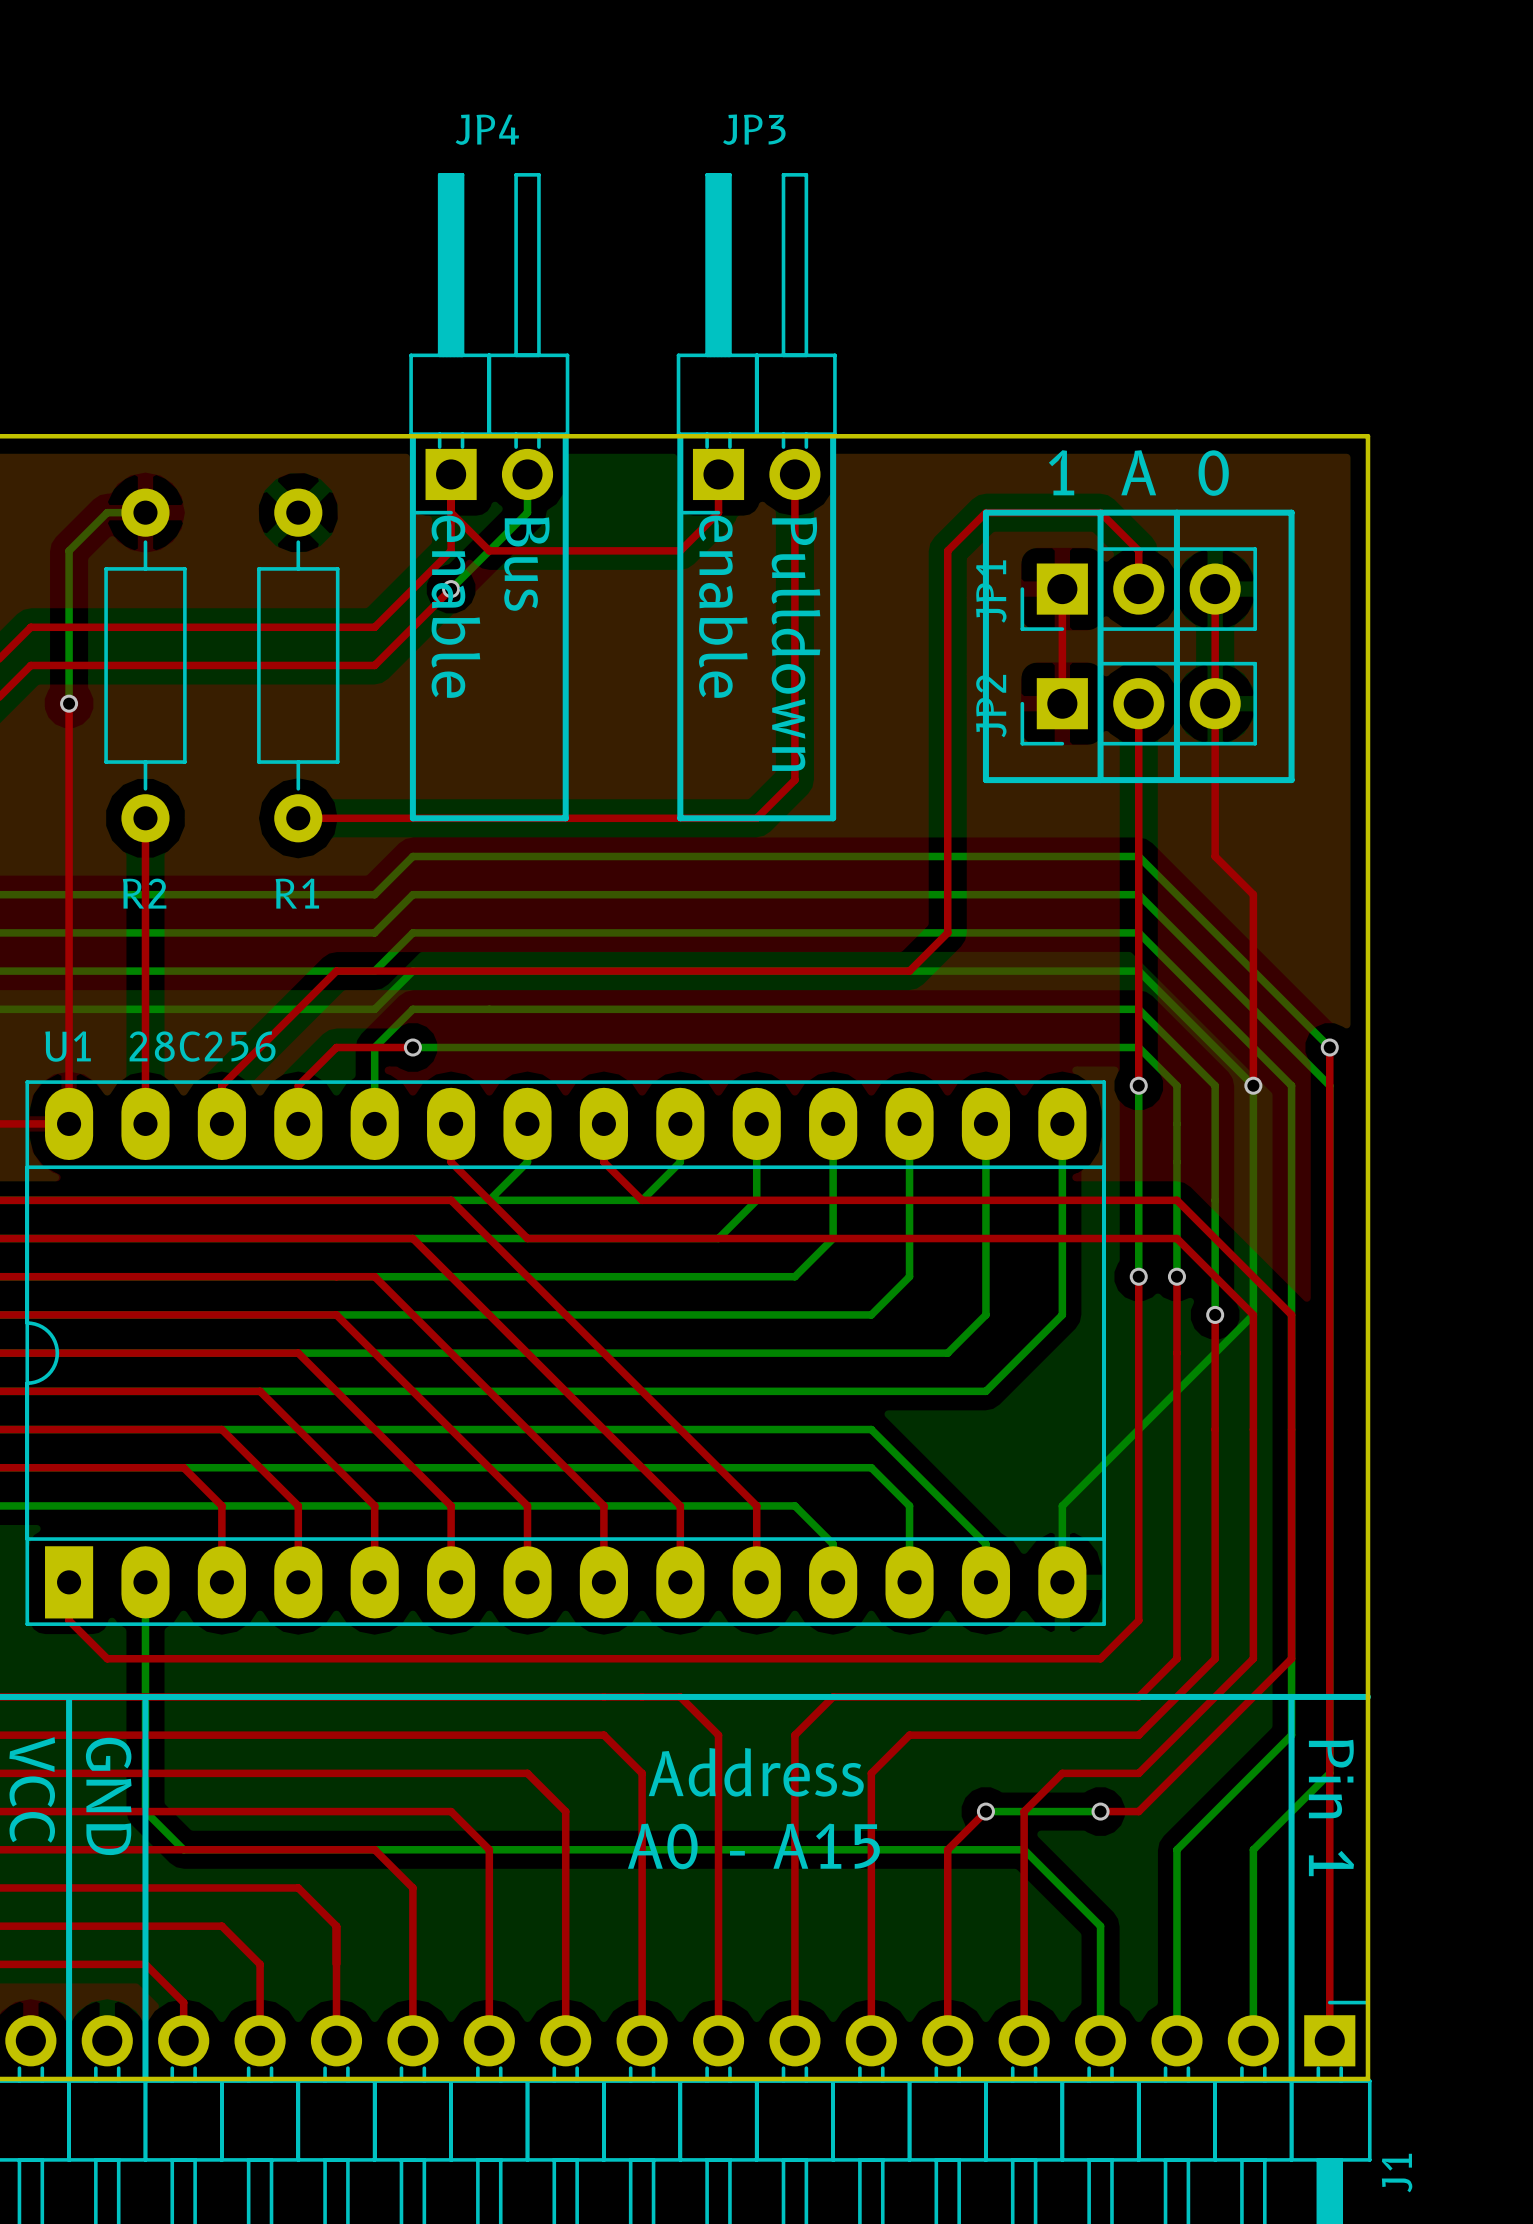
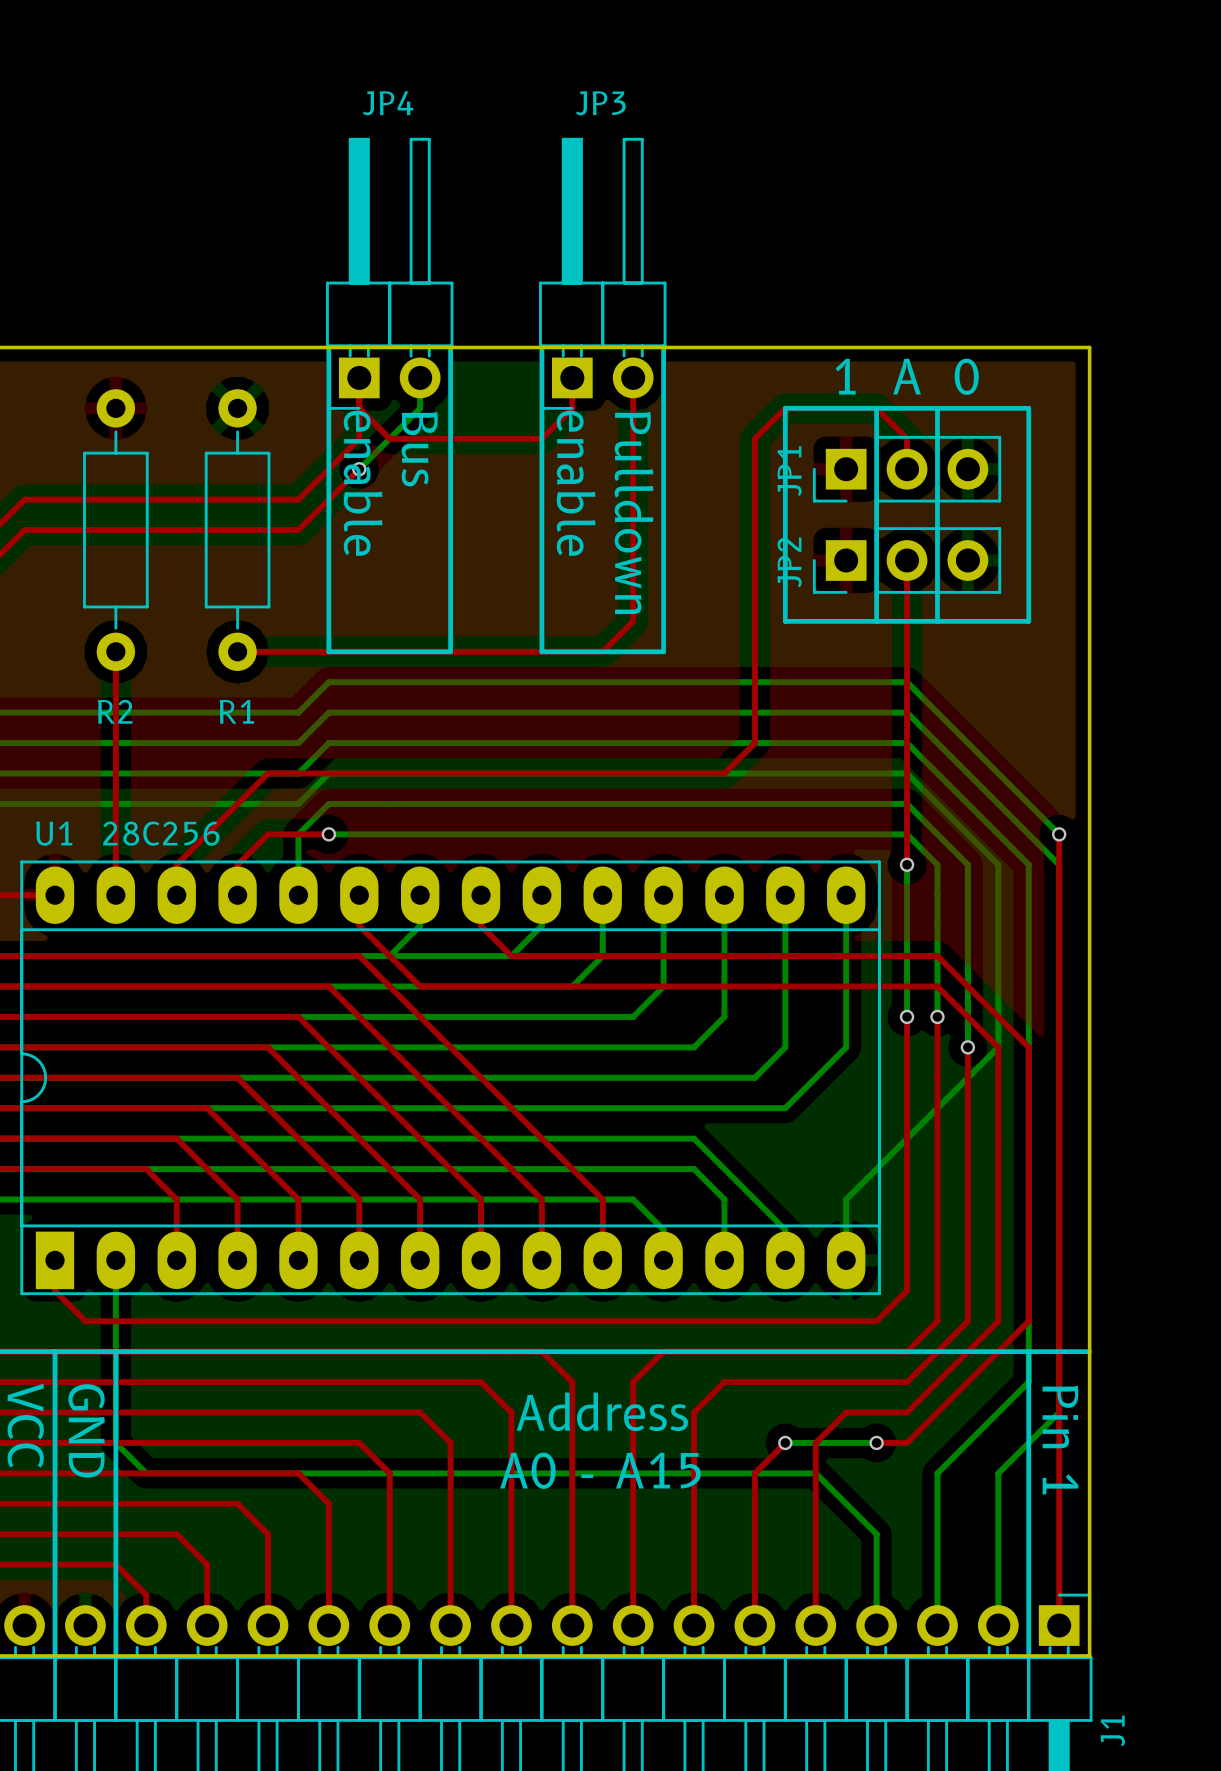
bottom track: (145, 512) (107, 512) (69, 550) (69, 703) -> none
top track: (1062, 589) (1062, 703) -> none
top track: (1215, 589) (1215, 856) (1253, 894) (1253, 1085) -> none
top track: (69, 703) (69, 1123) -> none
via: (69, 703) -> none
via: (1253, 1085) -> none

